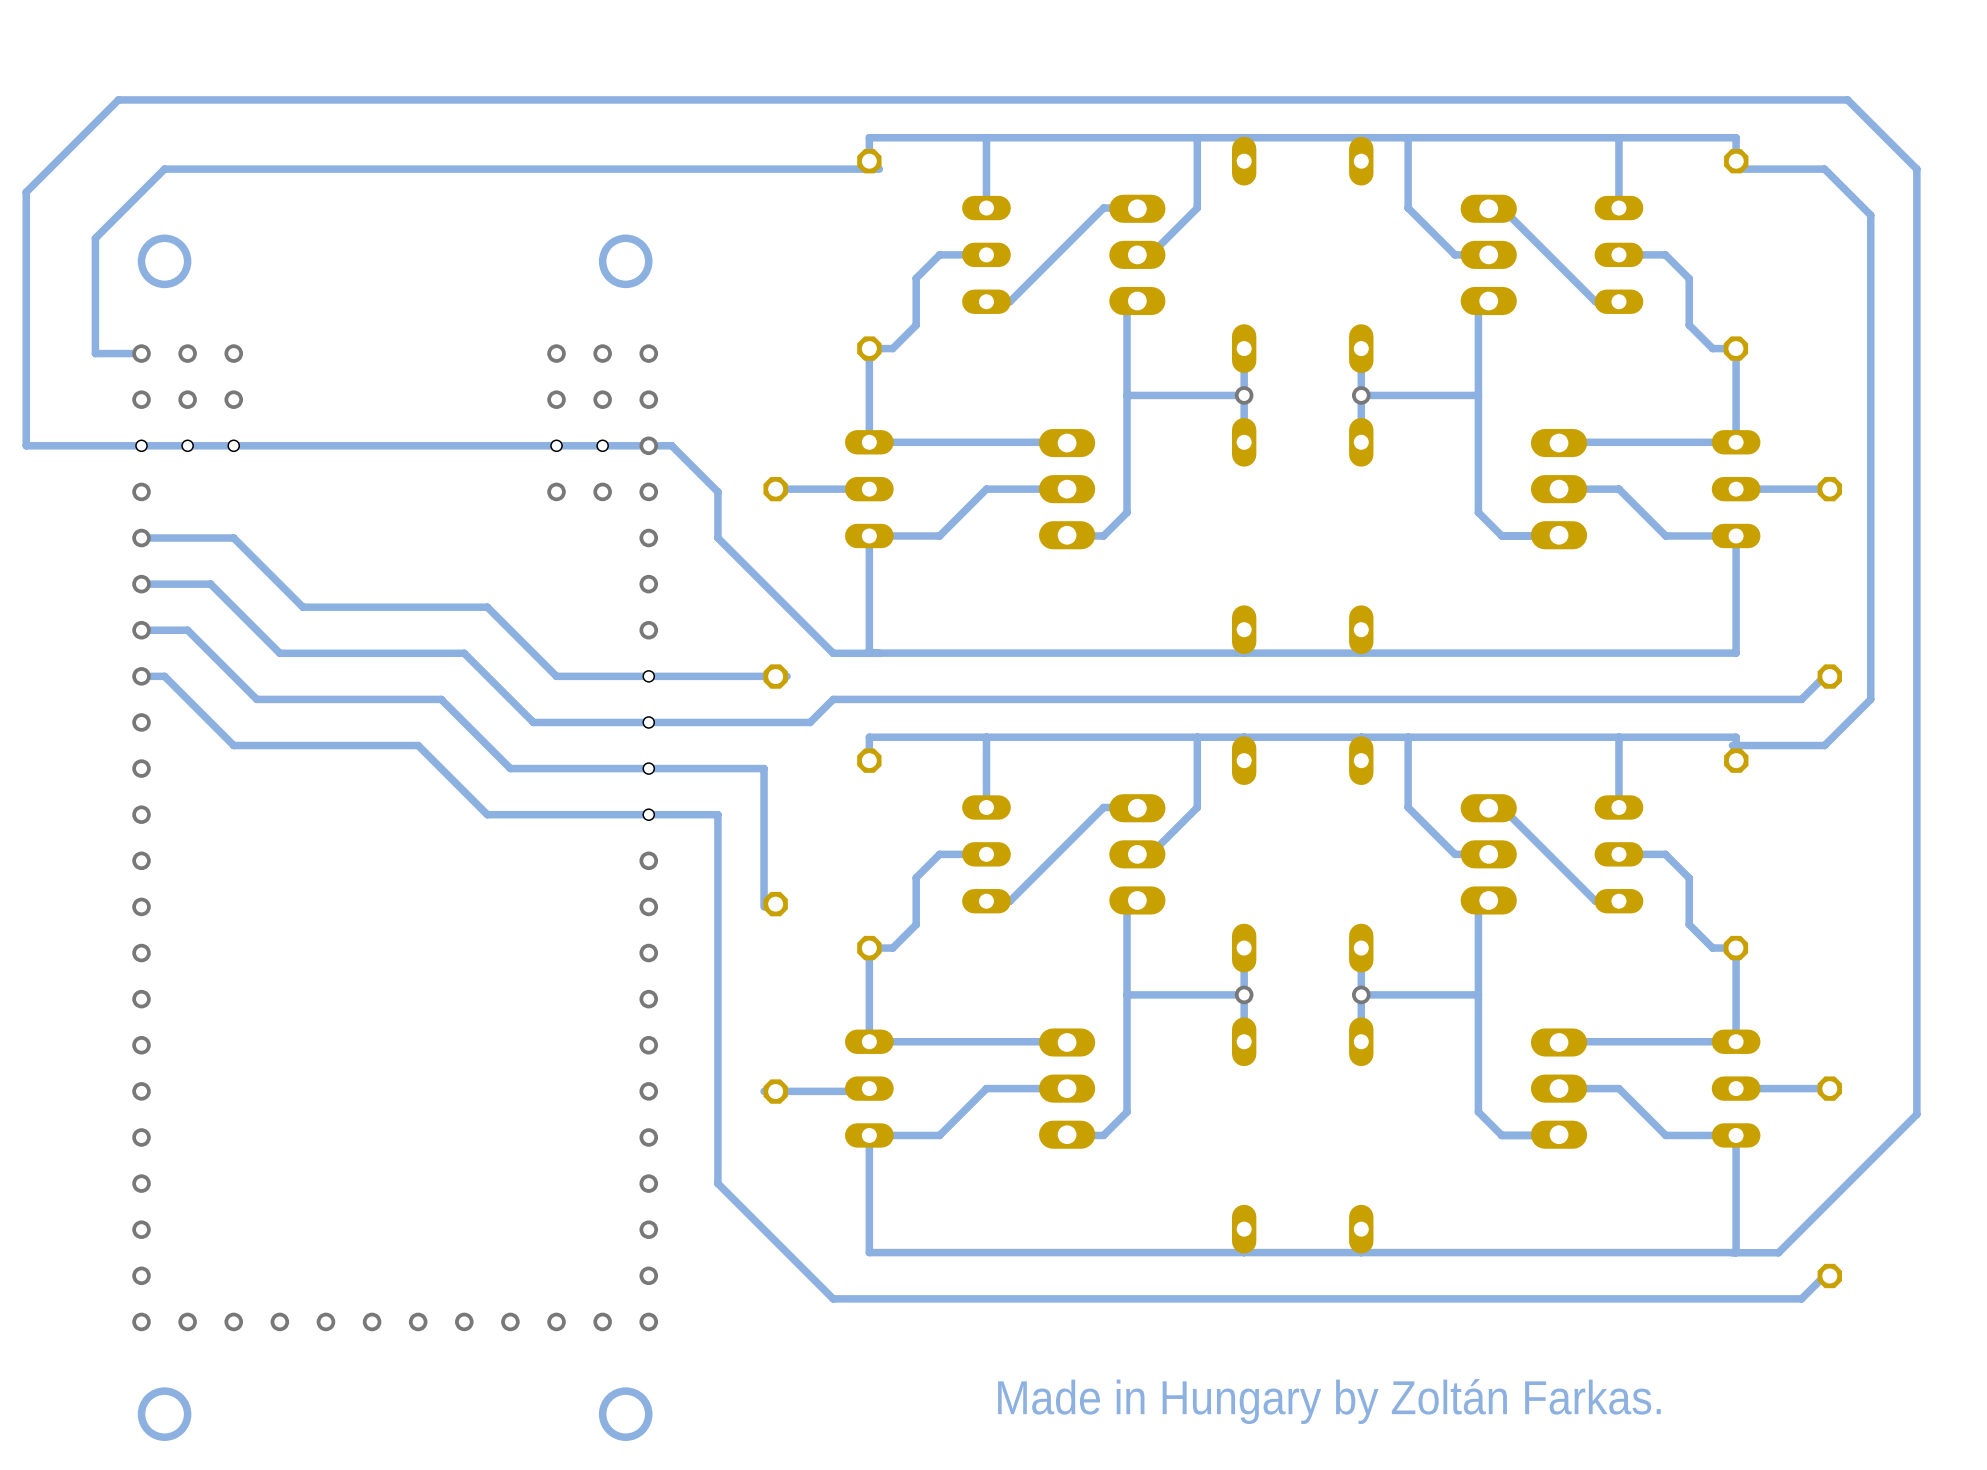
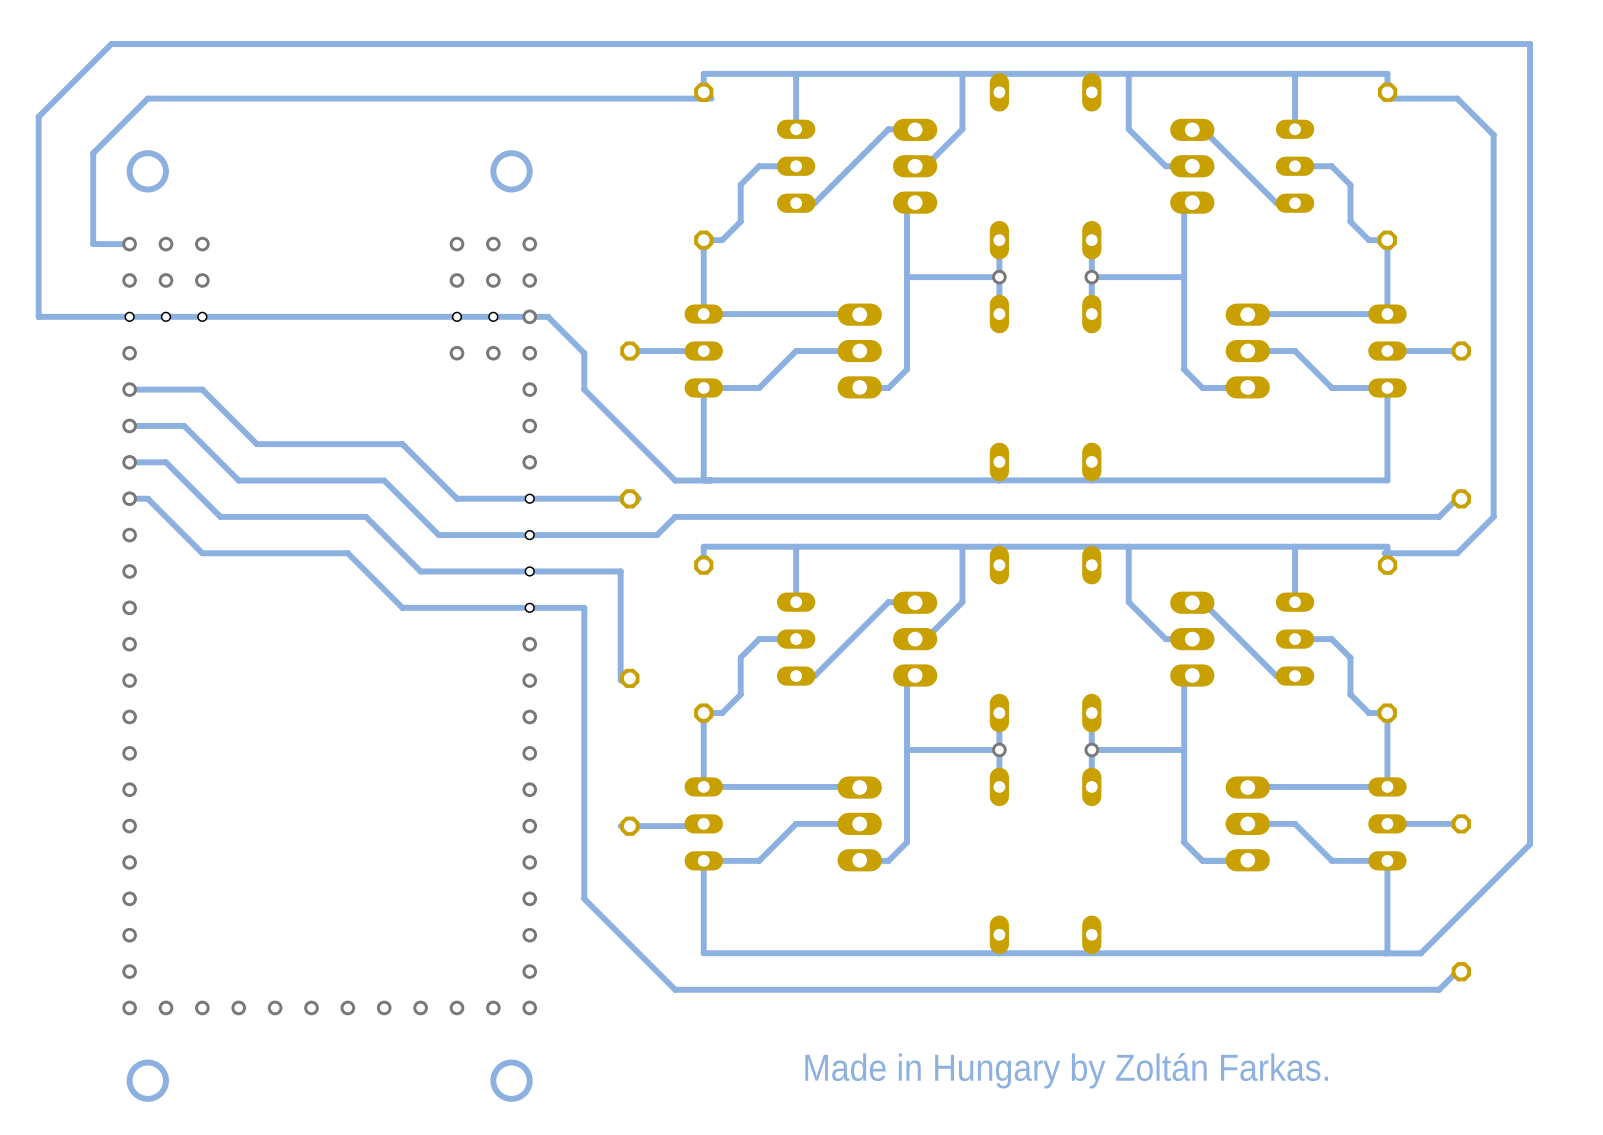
bottom track: (1847, 99) (1916, 169) -> (1475, 44) (1530, 44) (1530, 98)

